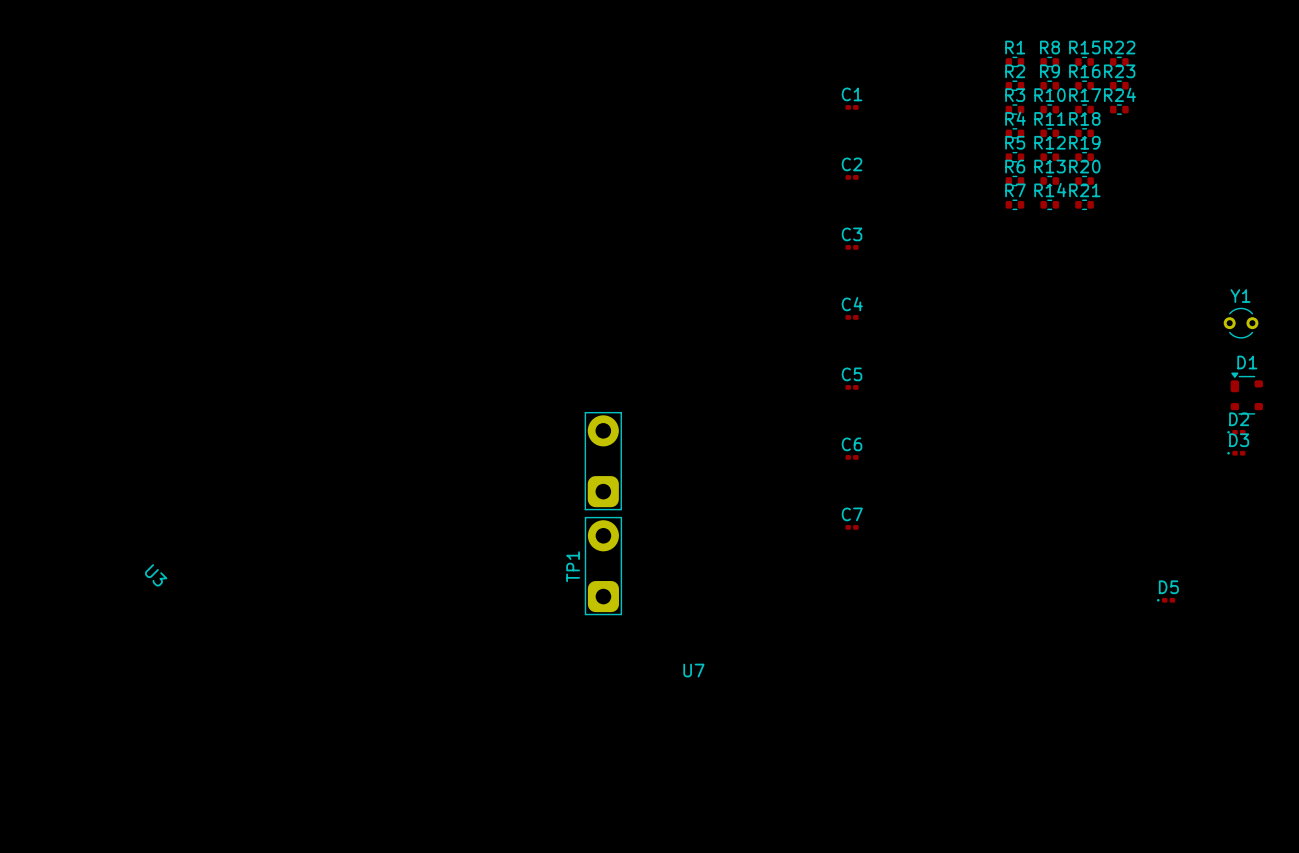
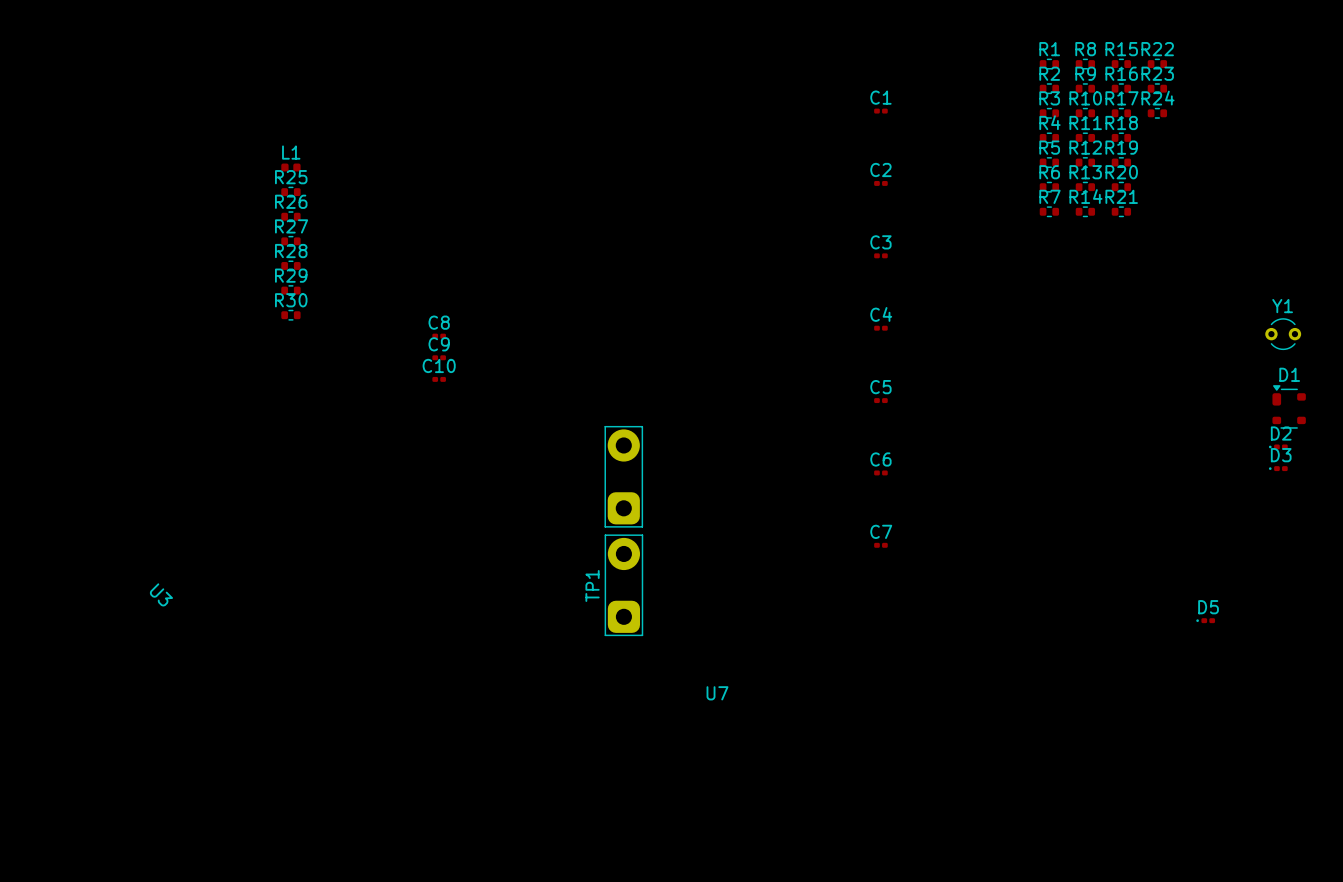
L1: none -> (290, 167)
R25: none -> (290, 192)
R26: none -> (290, 216)
R27: none -> (290, 241)
R28: none -> (290, 265)
R29: none -> (290, 290)
R30: none -> (290, 315)
C8: none -> (439, 336)
C9: none -> (439, 357)
C10: none -> (439, 379)

